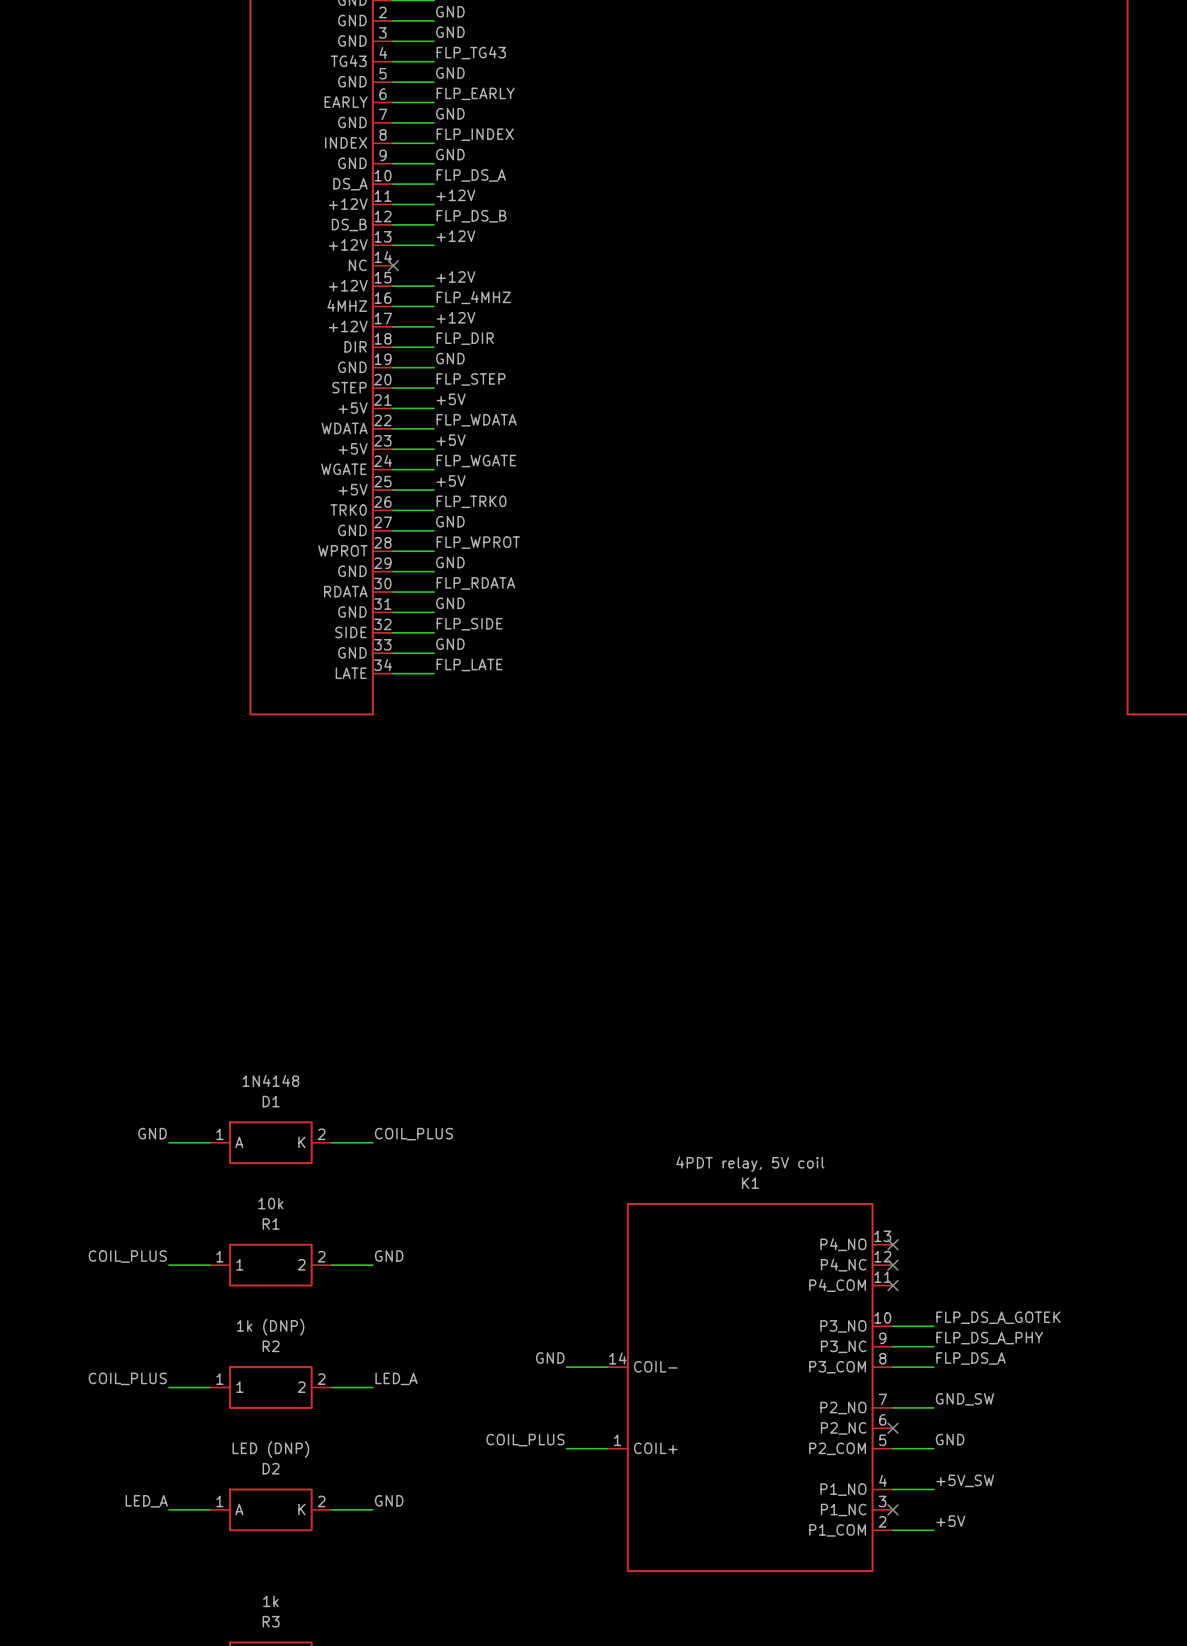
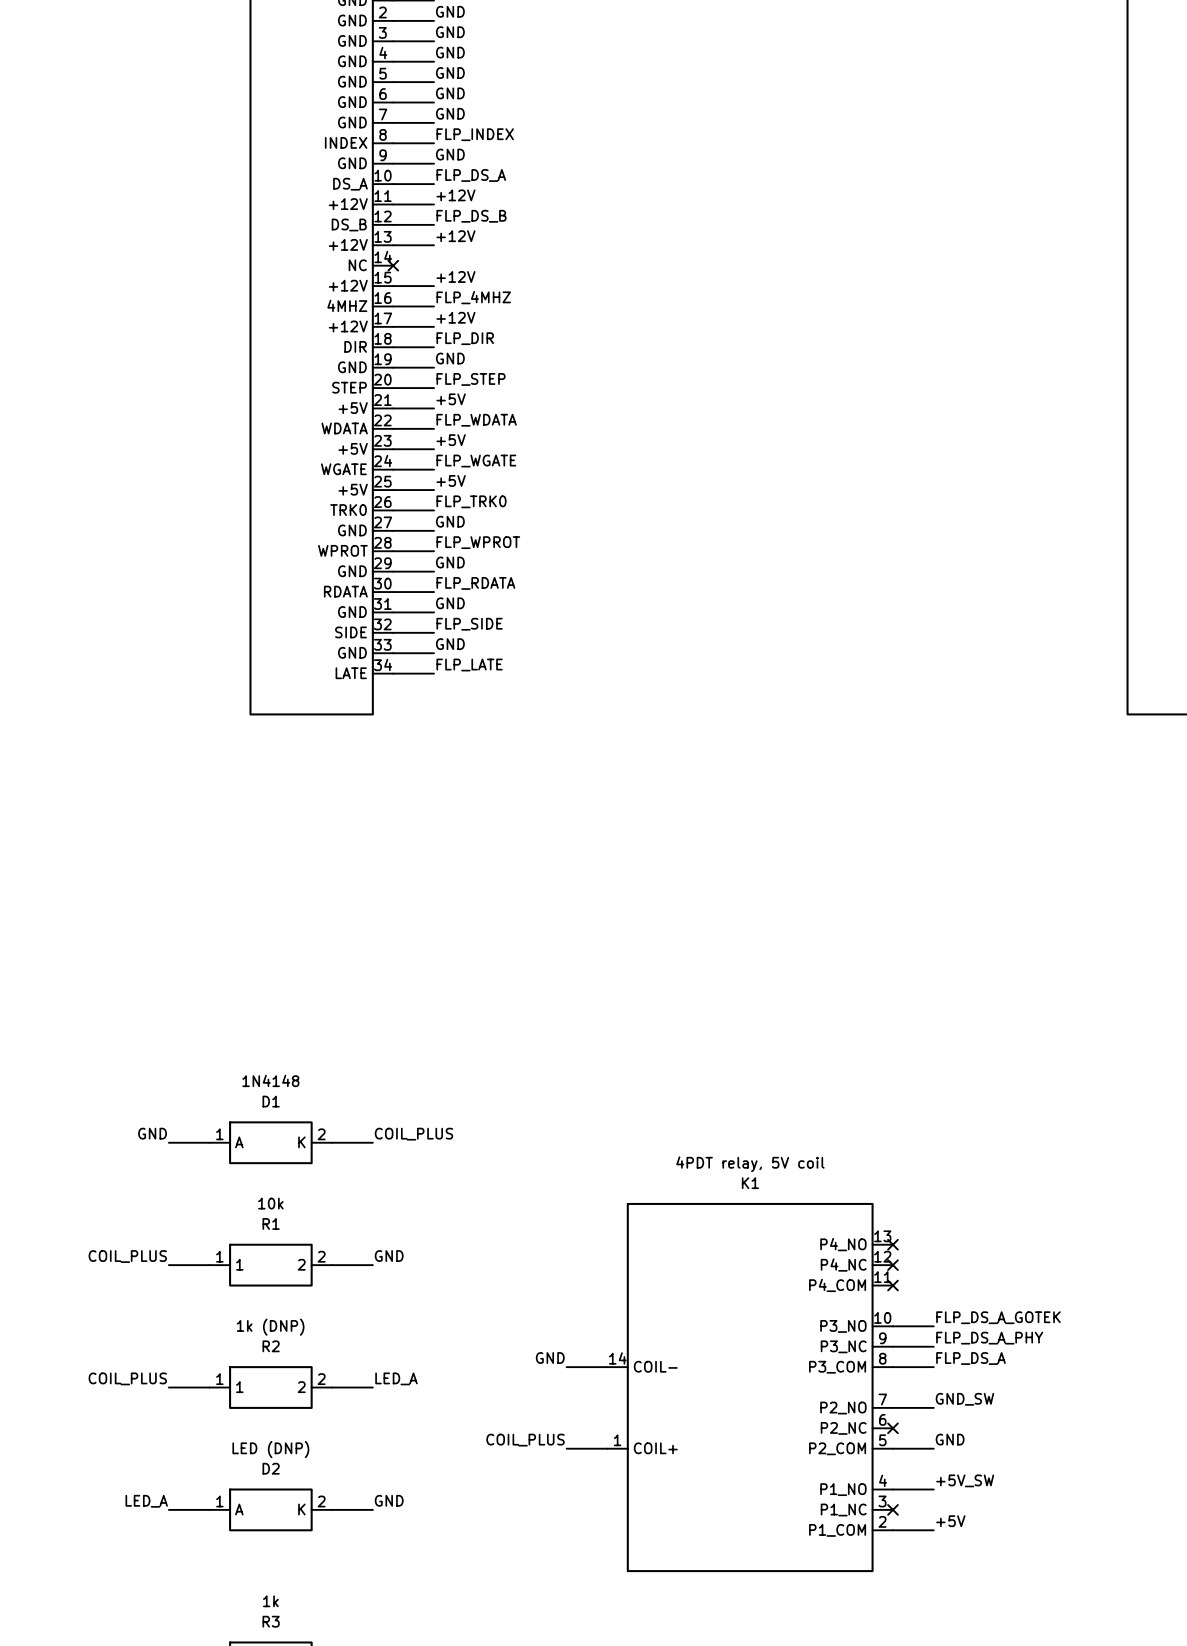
label: FLP_TG43 (471, 52) -> GND (450, 52)
part pin name: TG43 (348, 61) -> GND (352, 61)
label: FLP_EARLY (475, 93) -> GND (450, 93)
part pin name: EARLY (346, 102) -> GND (352, 102)

